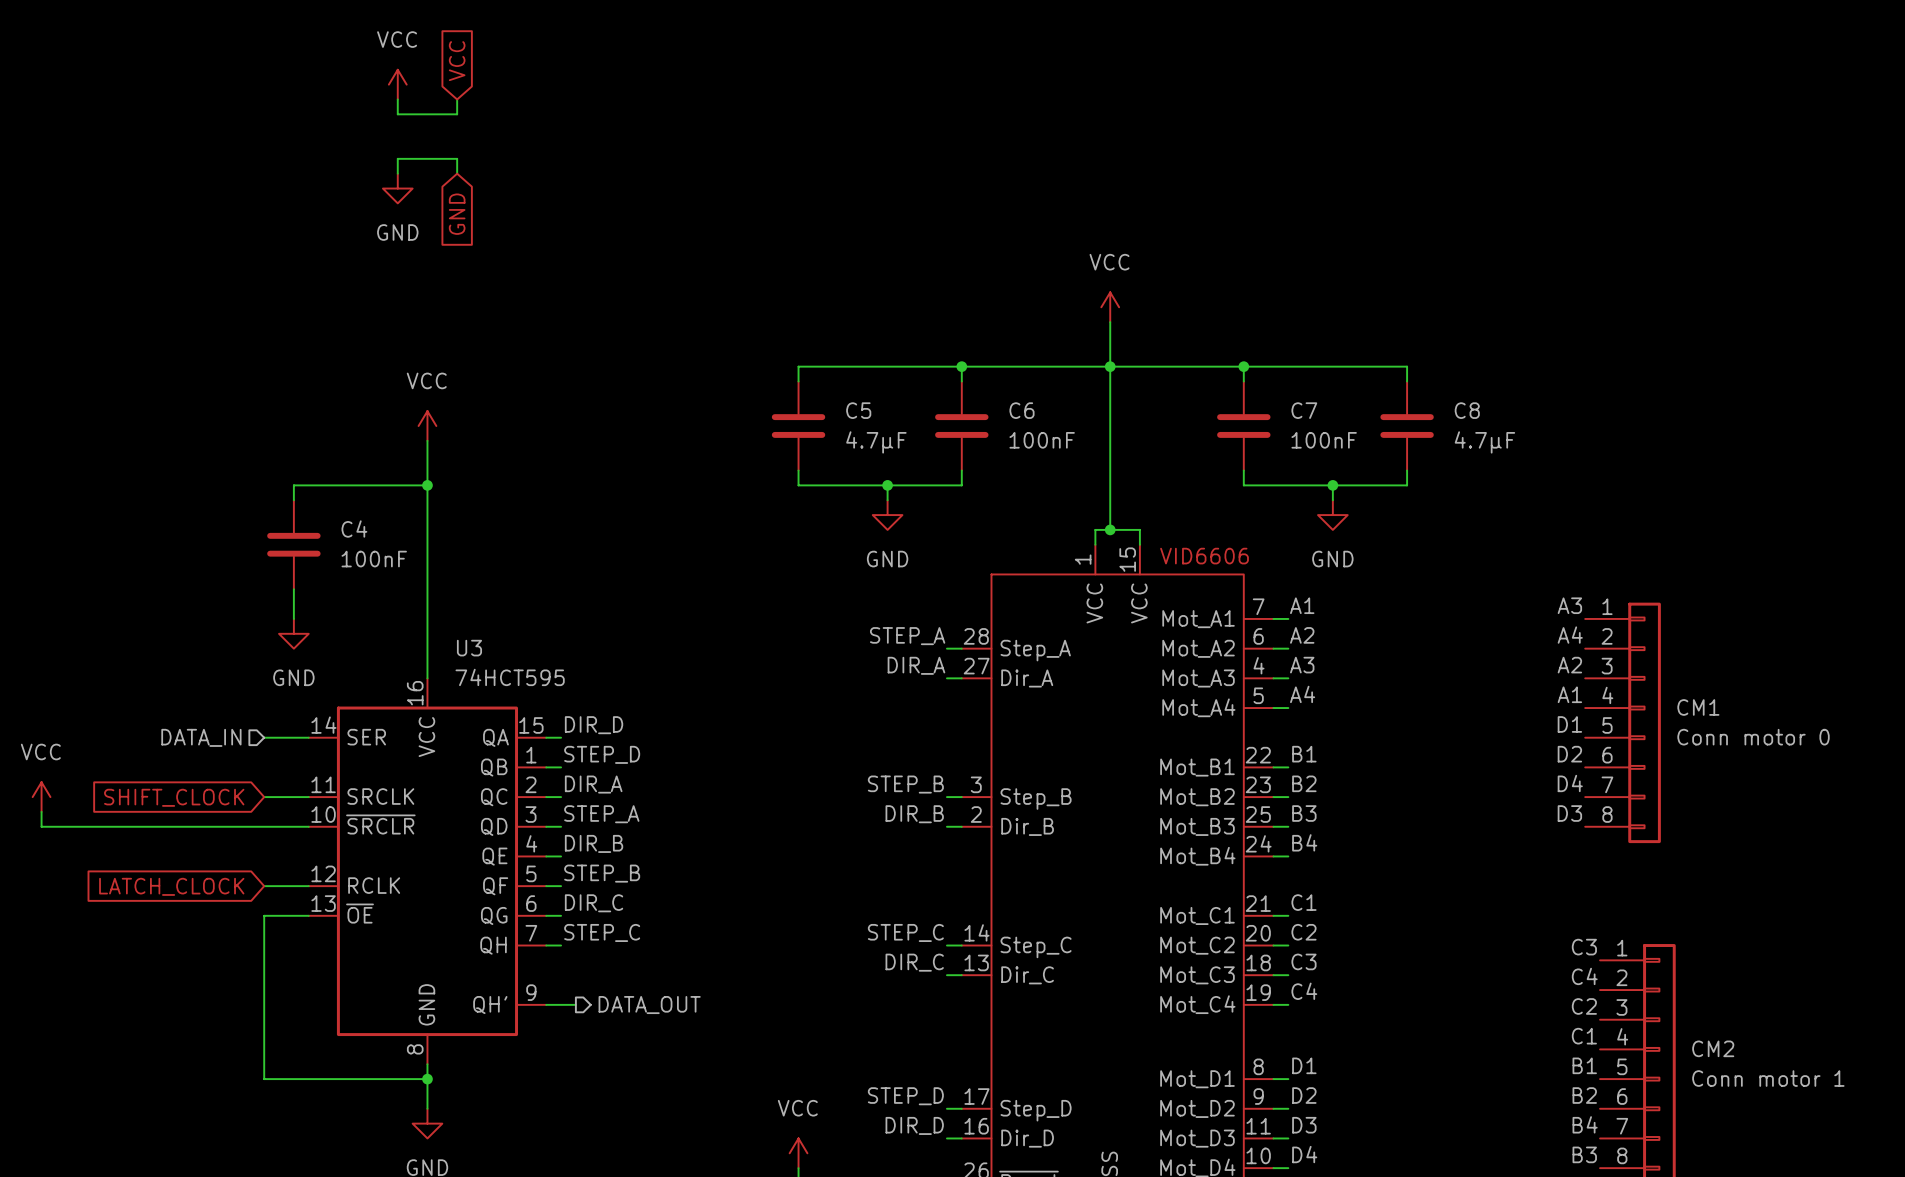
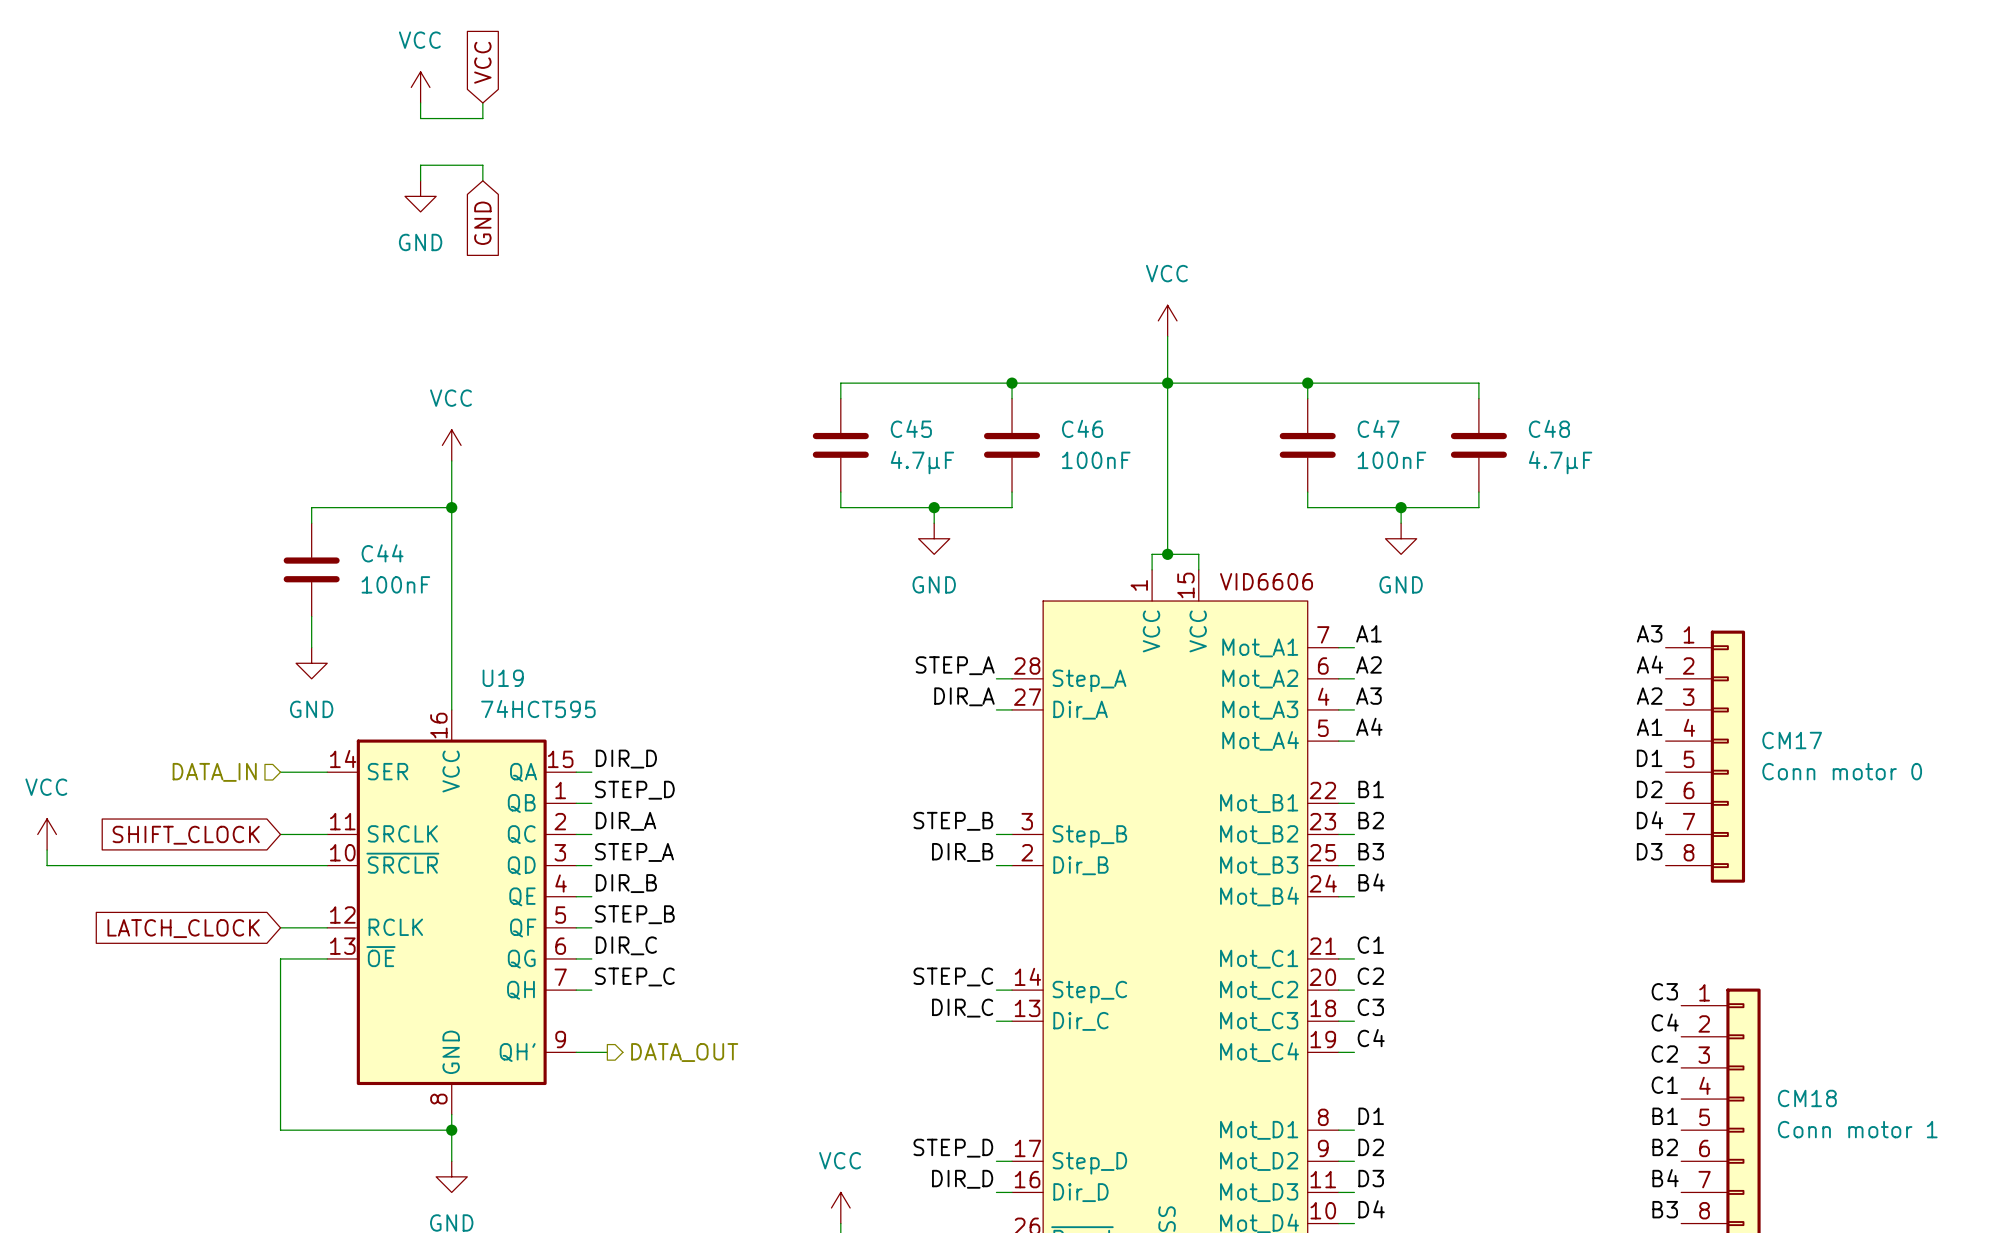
C5 name: C5 (858, 410) -> C45 (911, 428)
C6 name: C6 (1021, 410) -> C46 (1082, 428)
C7 name: C7 (1304, 410) -> C47 (1378, 428)
C8 name: C8 (1467, 410) -> C48 (1549, 428)
C4 name: C4 (354, 529) -> C44 (382, 553)
U3 name: U3 (469, 648) -> U19 (503, 678)
CM1 name: CM1 (1698, 707) -> CM17 (1792, 740)
CM2 name: CM2 (1713, 1048) -> CM18 (1807, 1098)

